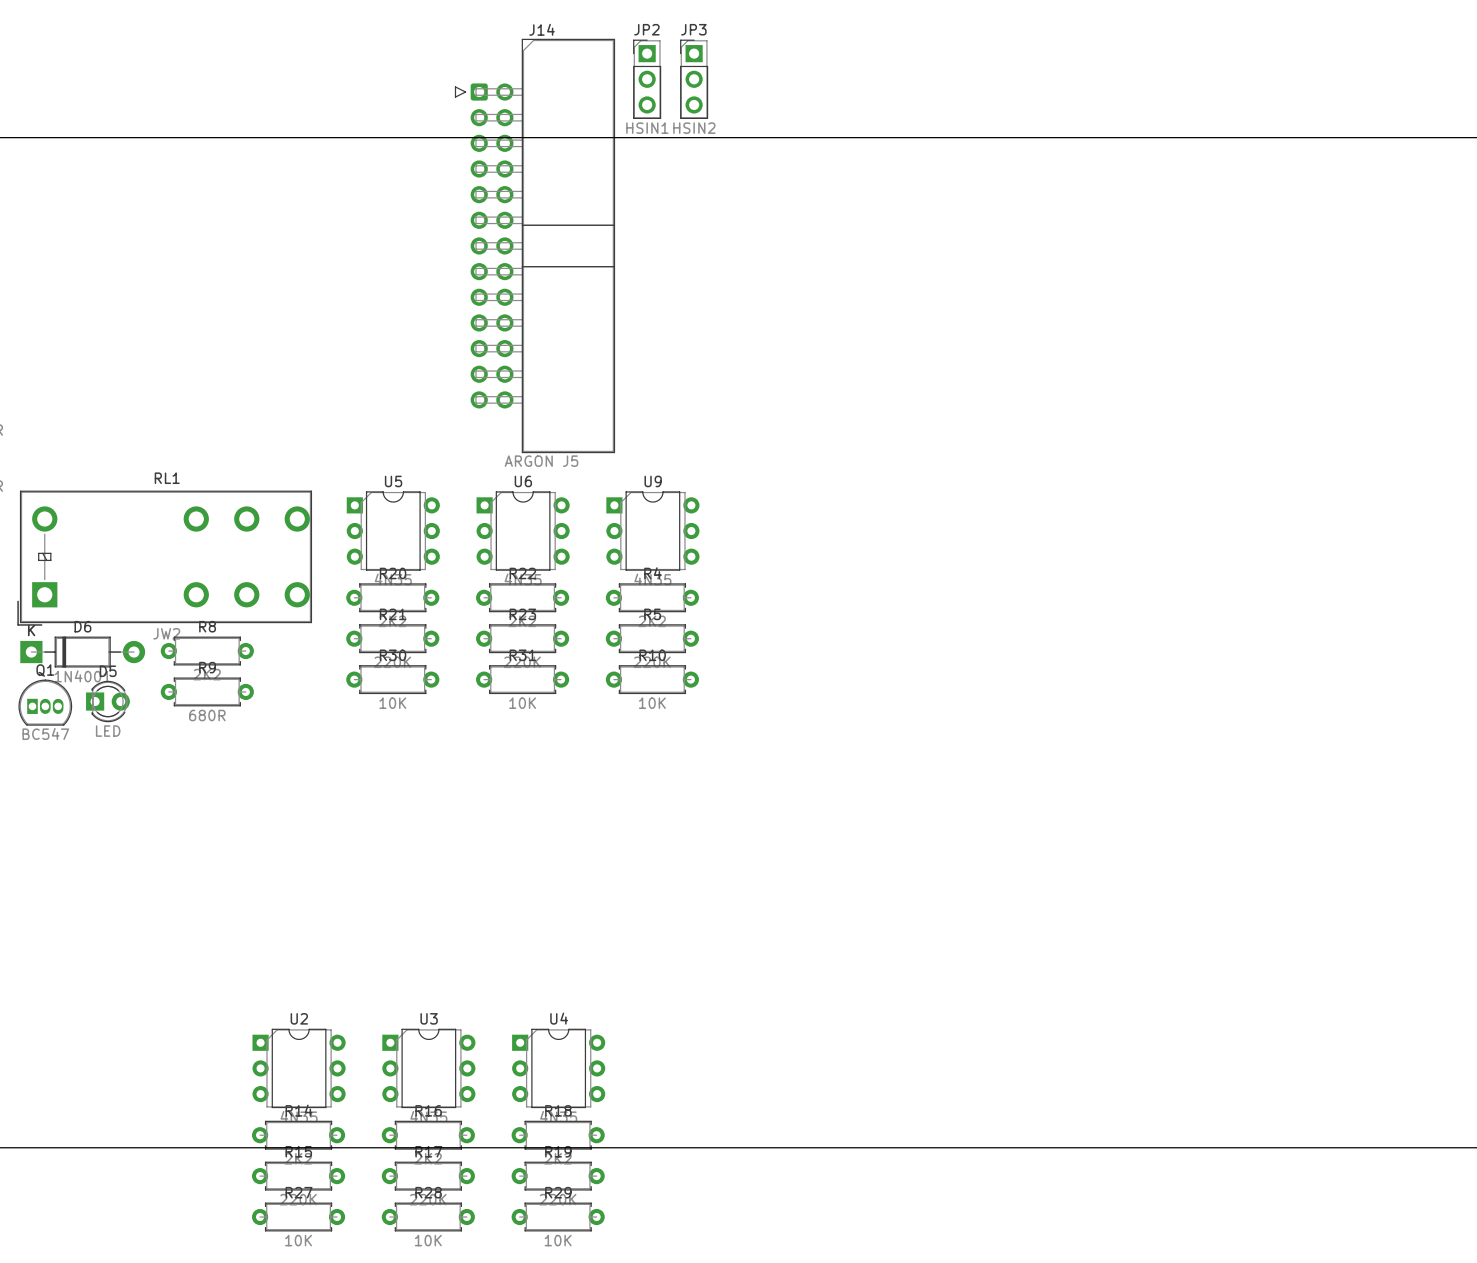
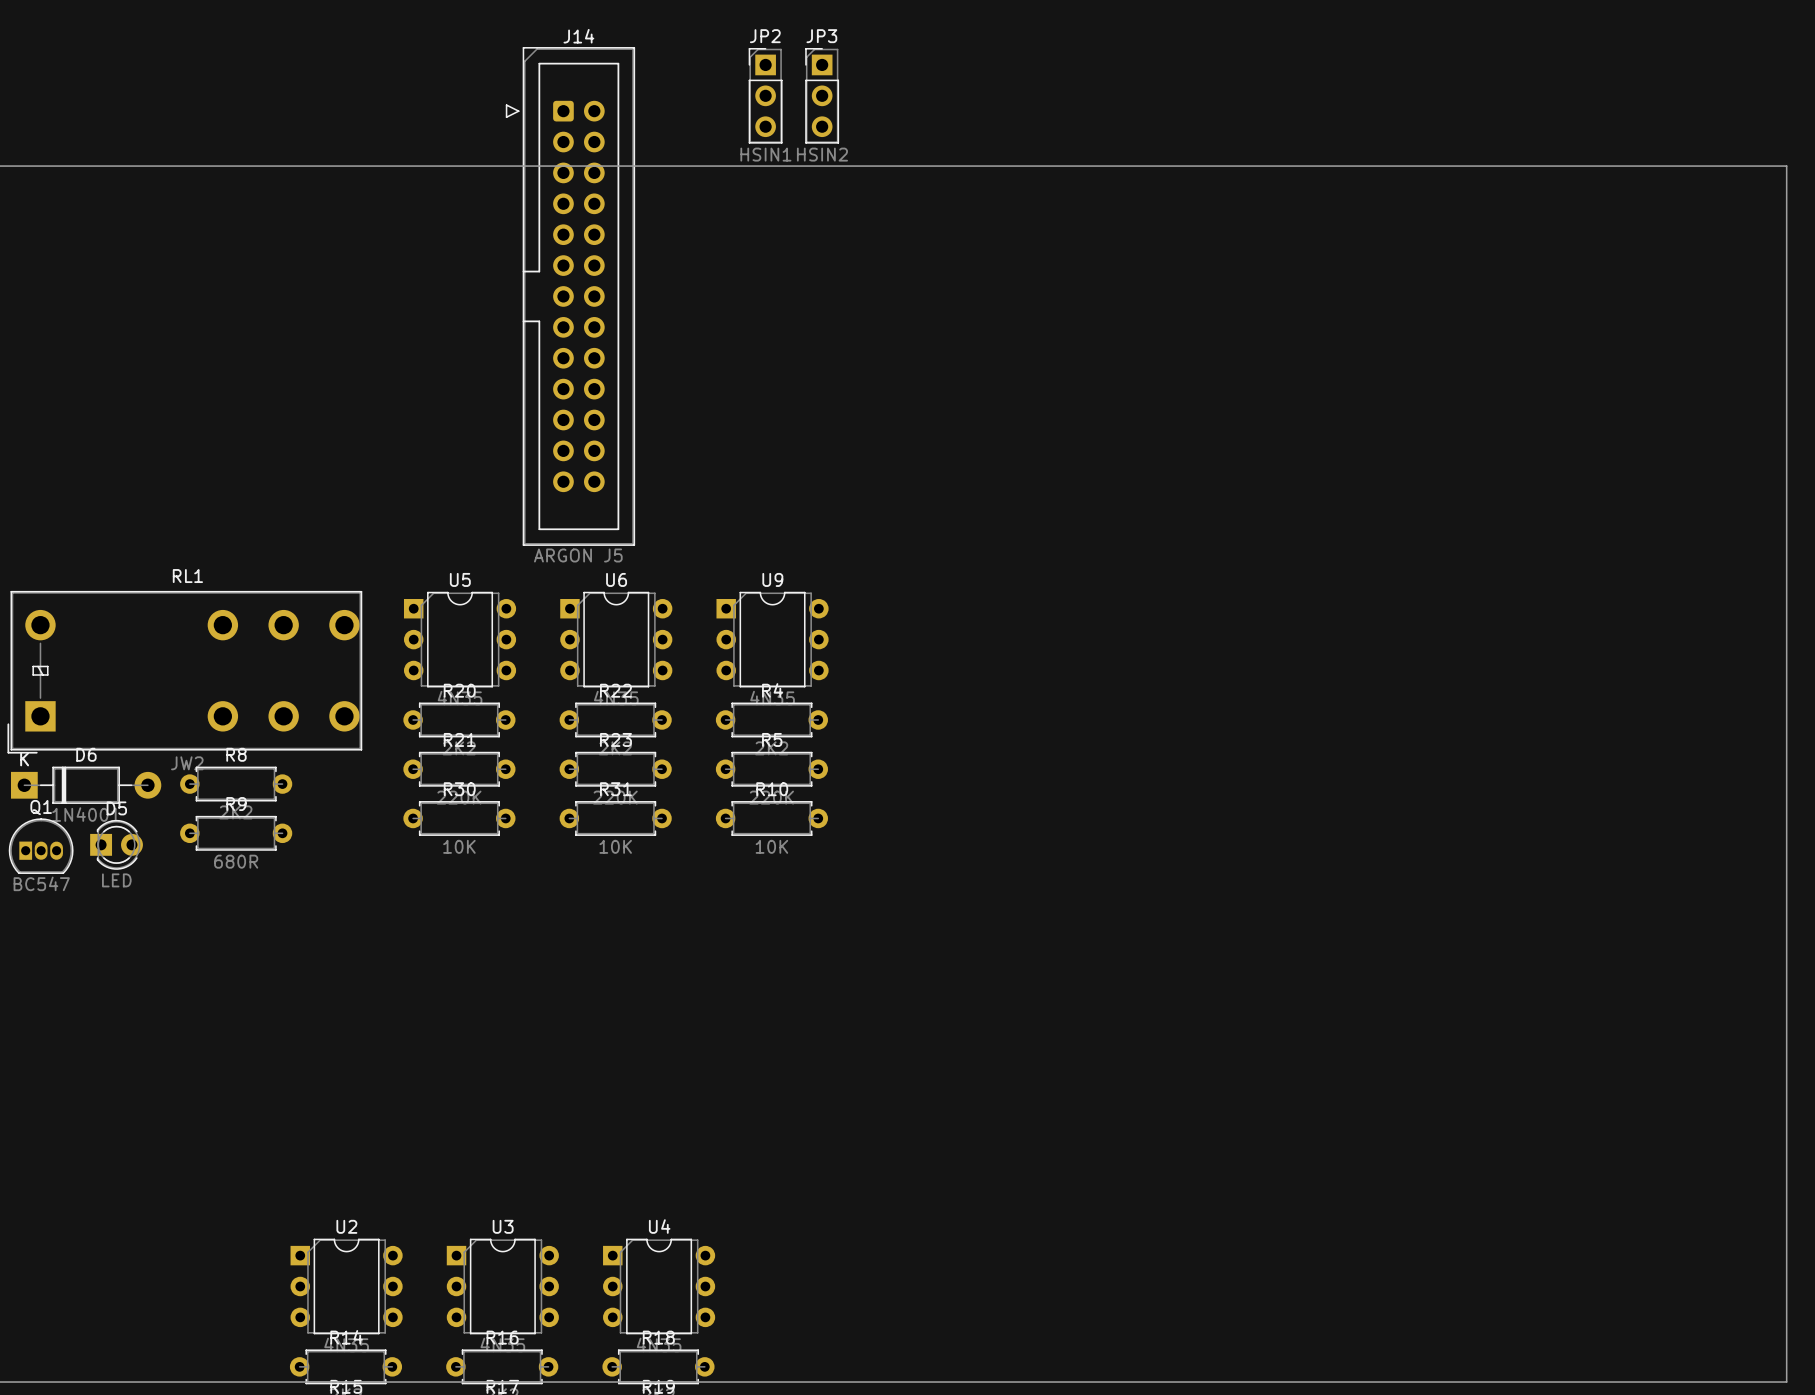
J14 footprint: [454, 38, 616, 454] -> [505, 47, 636, 546]

